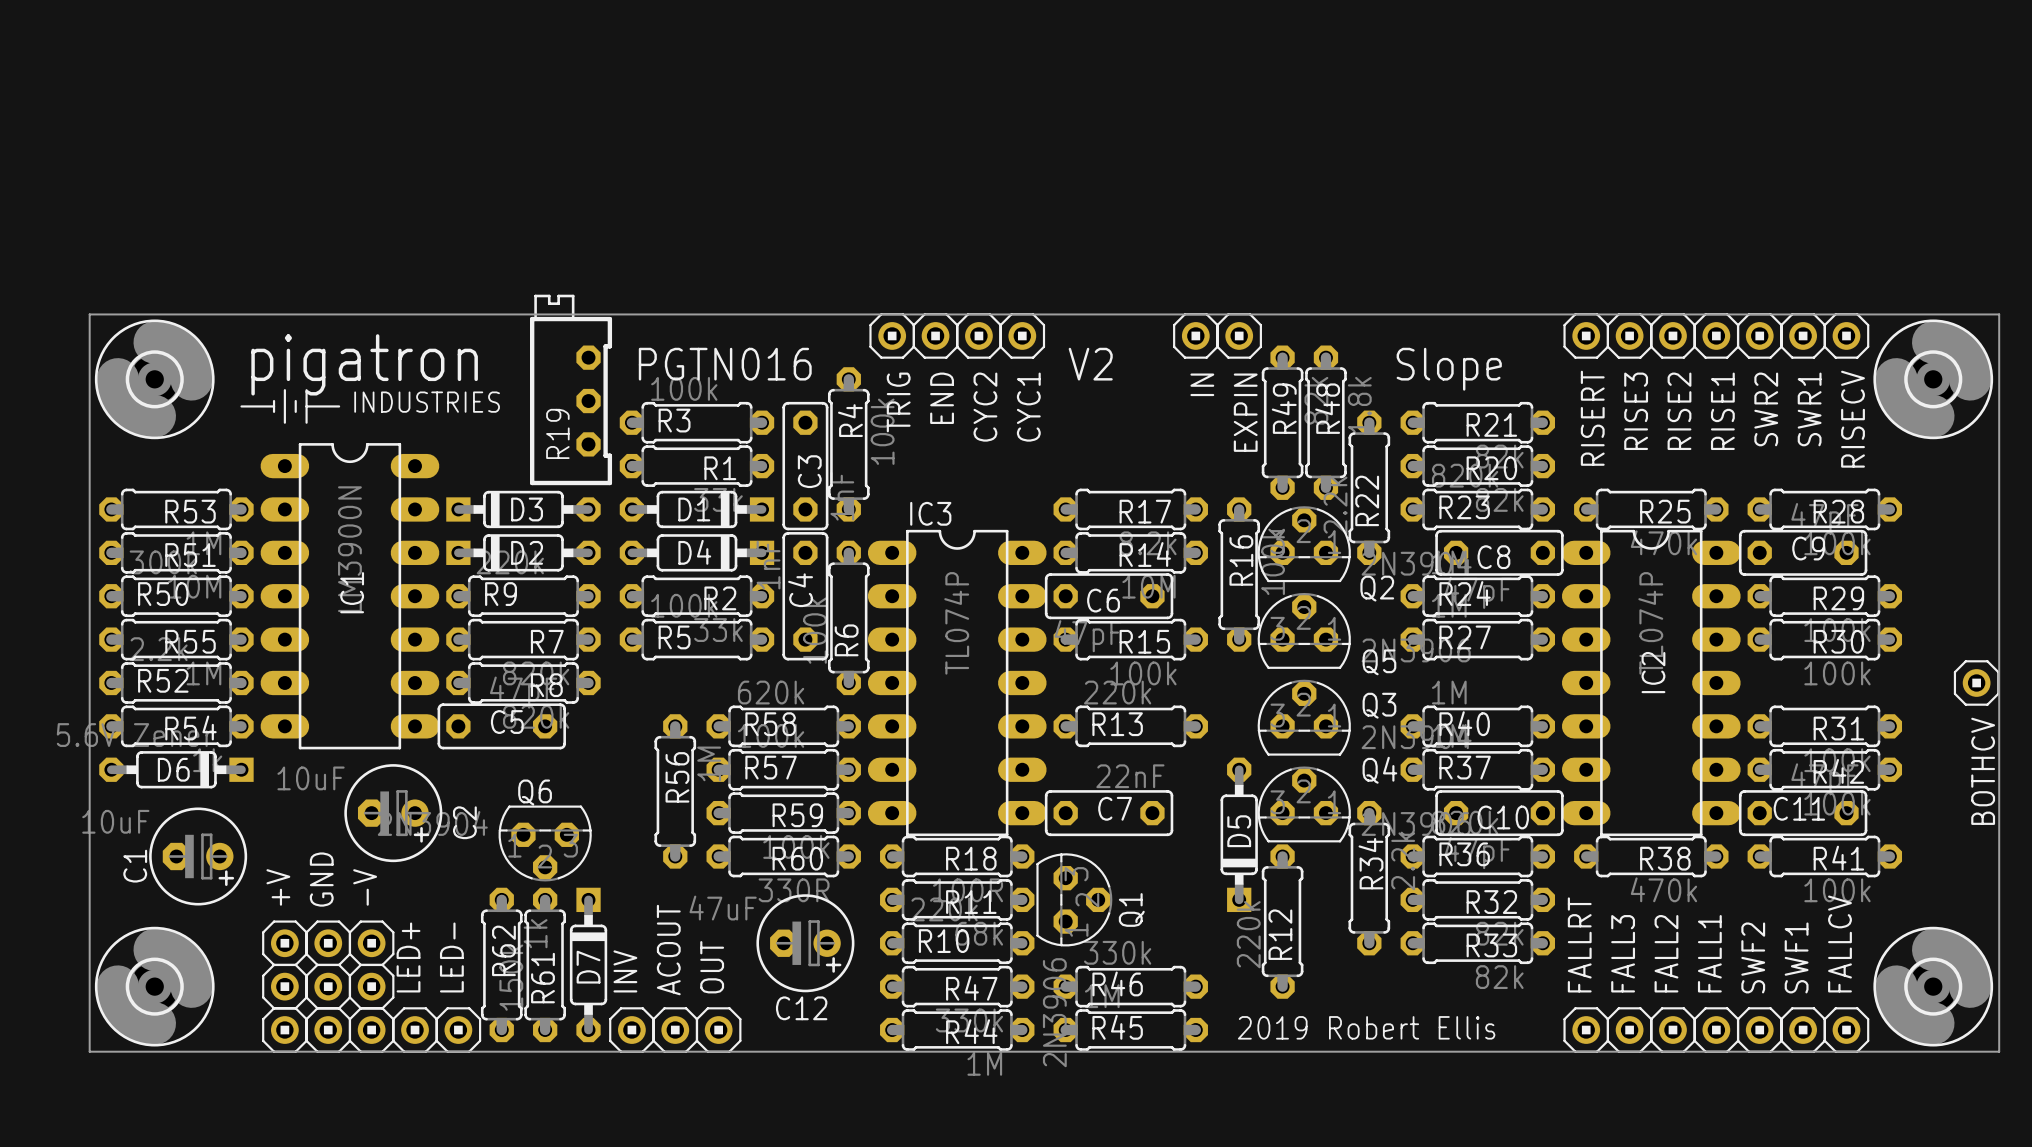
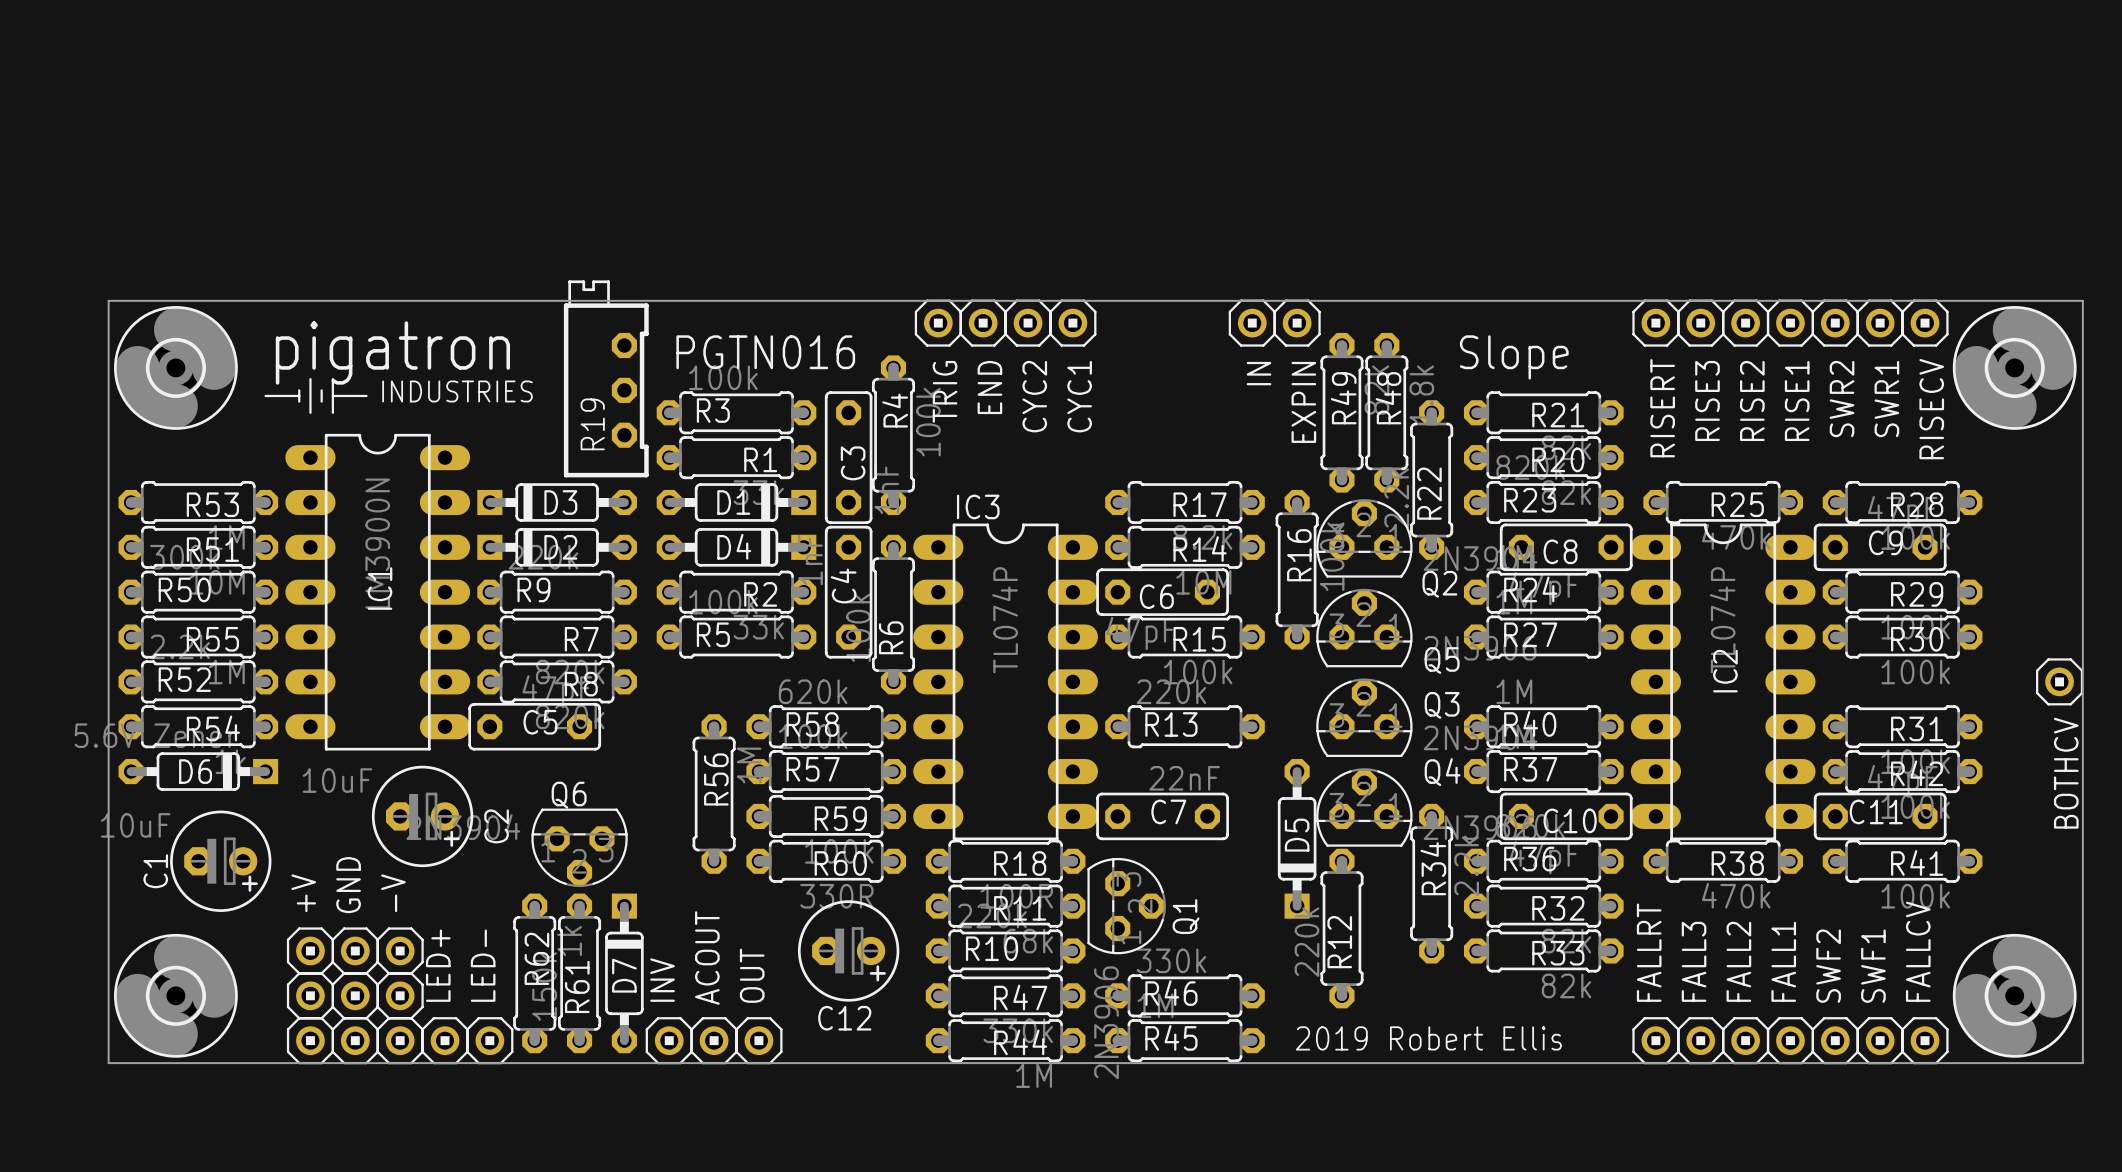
text: V2 (1090, 364) -> none
C12 value: 47uF (723, 908) -> none

